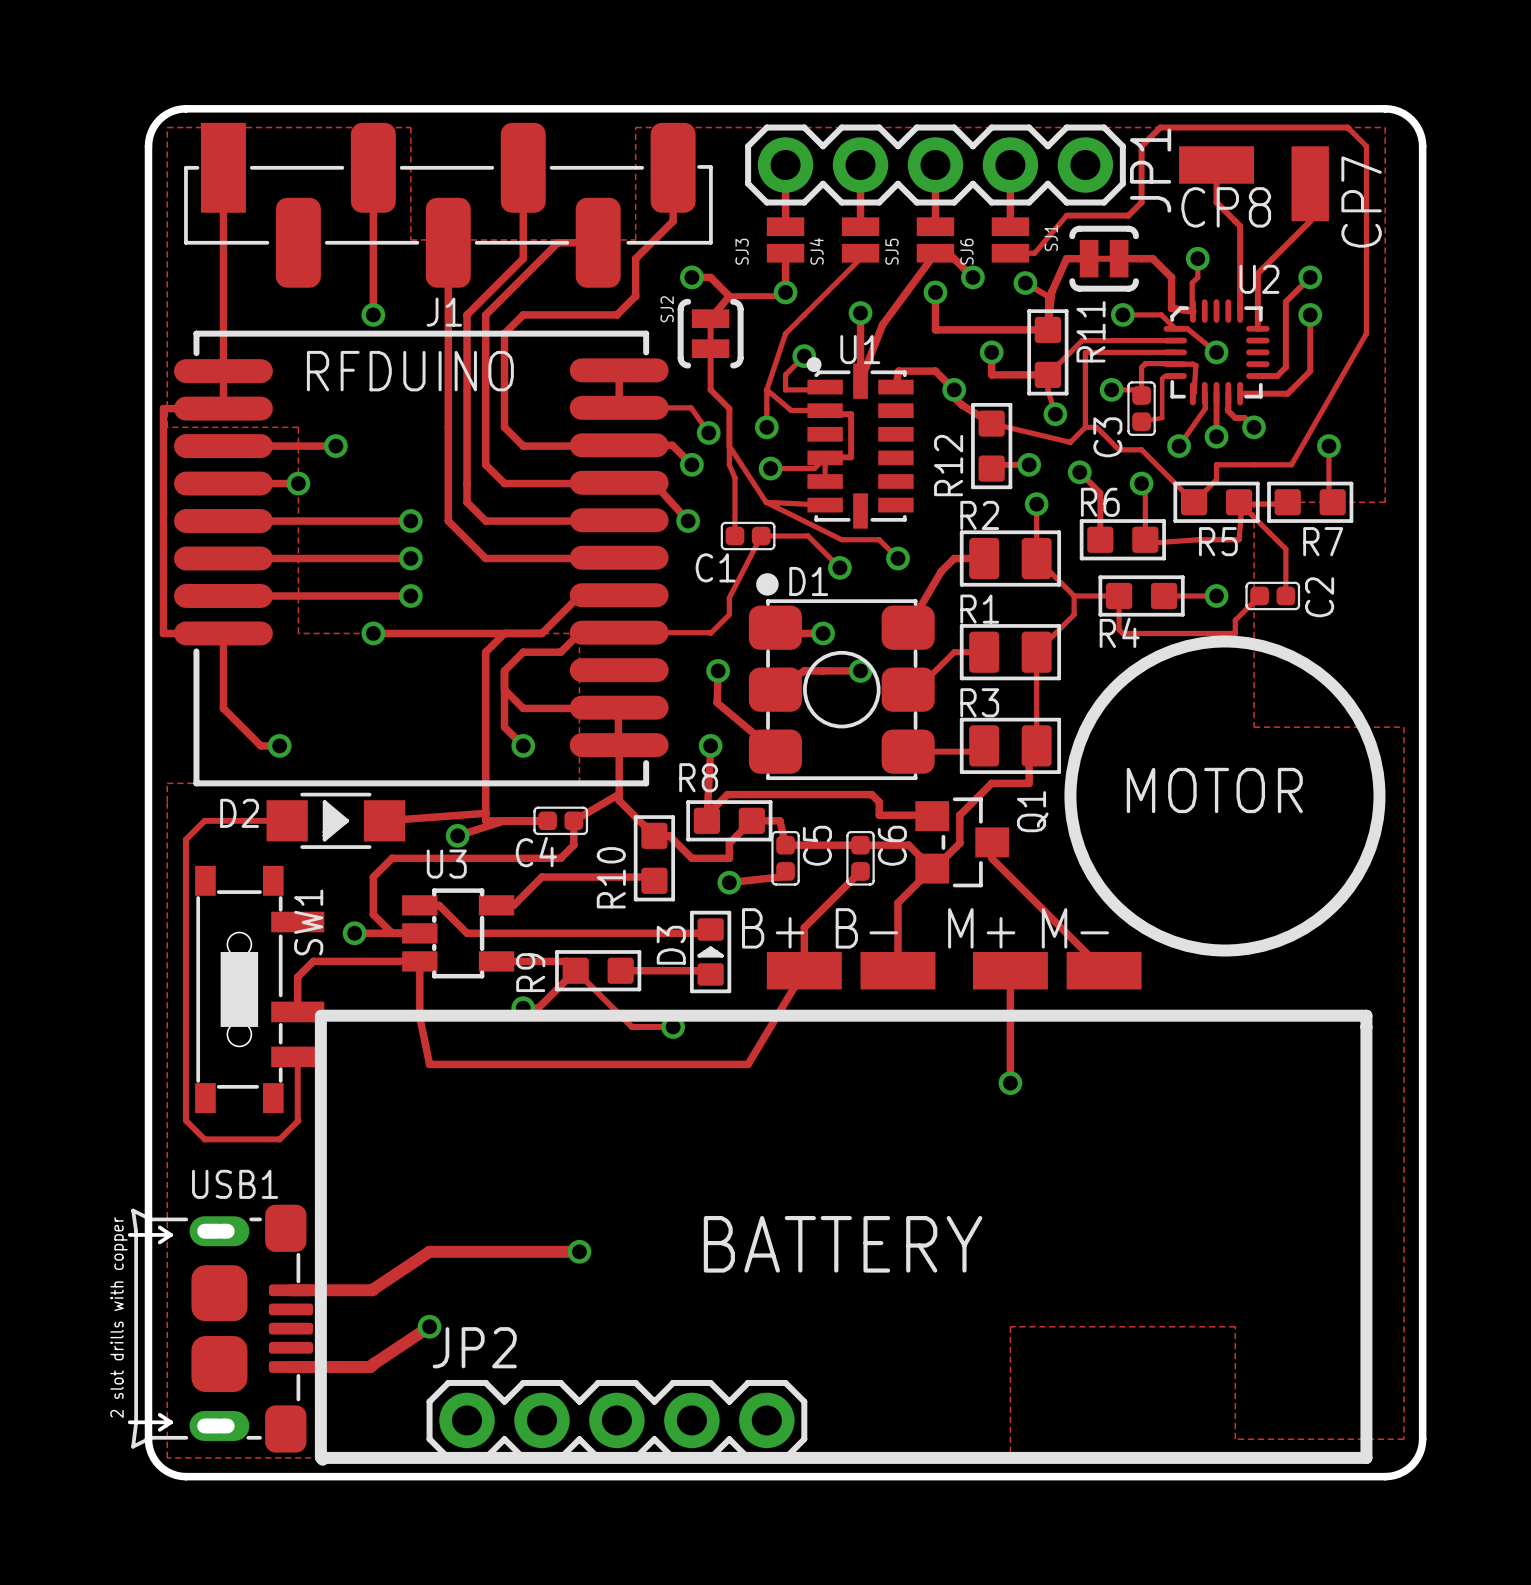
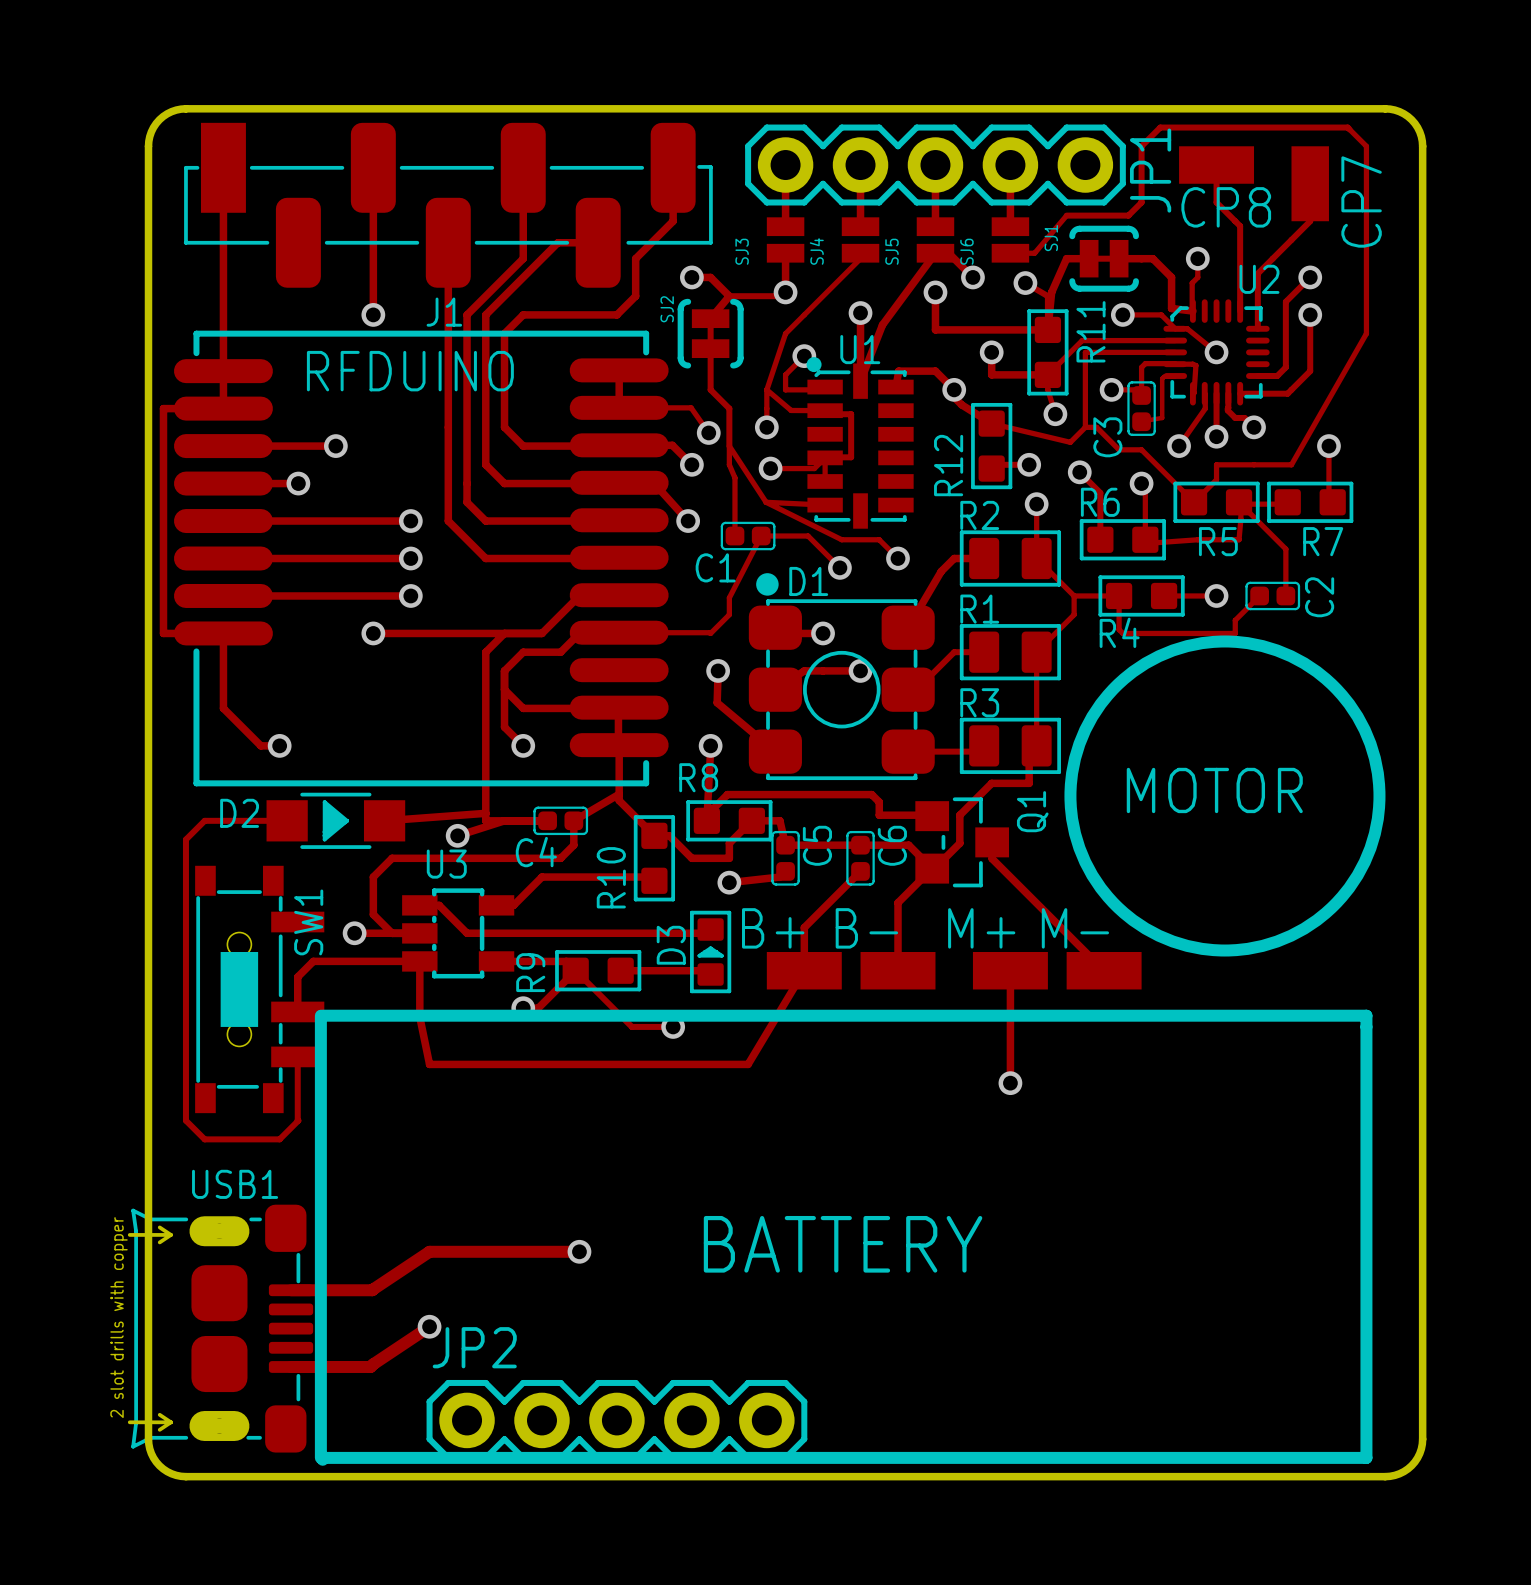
zone outline: (167, 127) (410, 127) (410, 239) (635, 239) (635, 127) (1385, 127) (1385, 502) (1254, 502) (1254, 727) (1403, 727) (1403, 1439) (1235, 1439) (1235, 1326) (1010, 1326) (1010, 1457) (167, 1457) (167, 783) (579, 783) (579, 633) (298, 633) (298, 427) (167, 427) (167, 127) -> none

